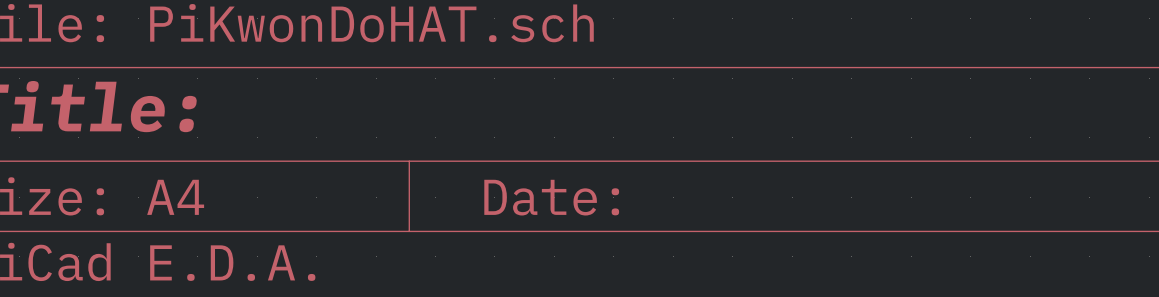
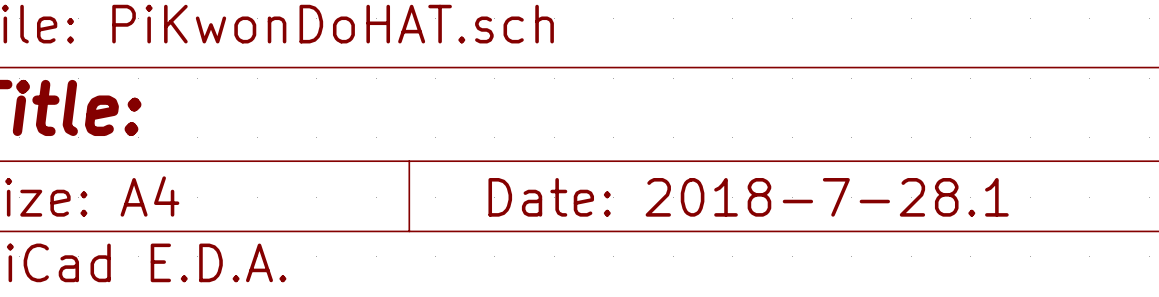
title block: Date: (551, 197) -> Date: 2018-7-28.1 (748, 197)

